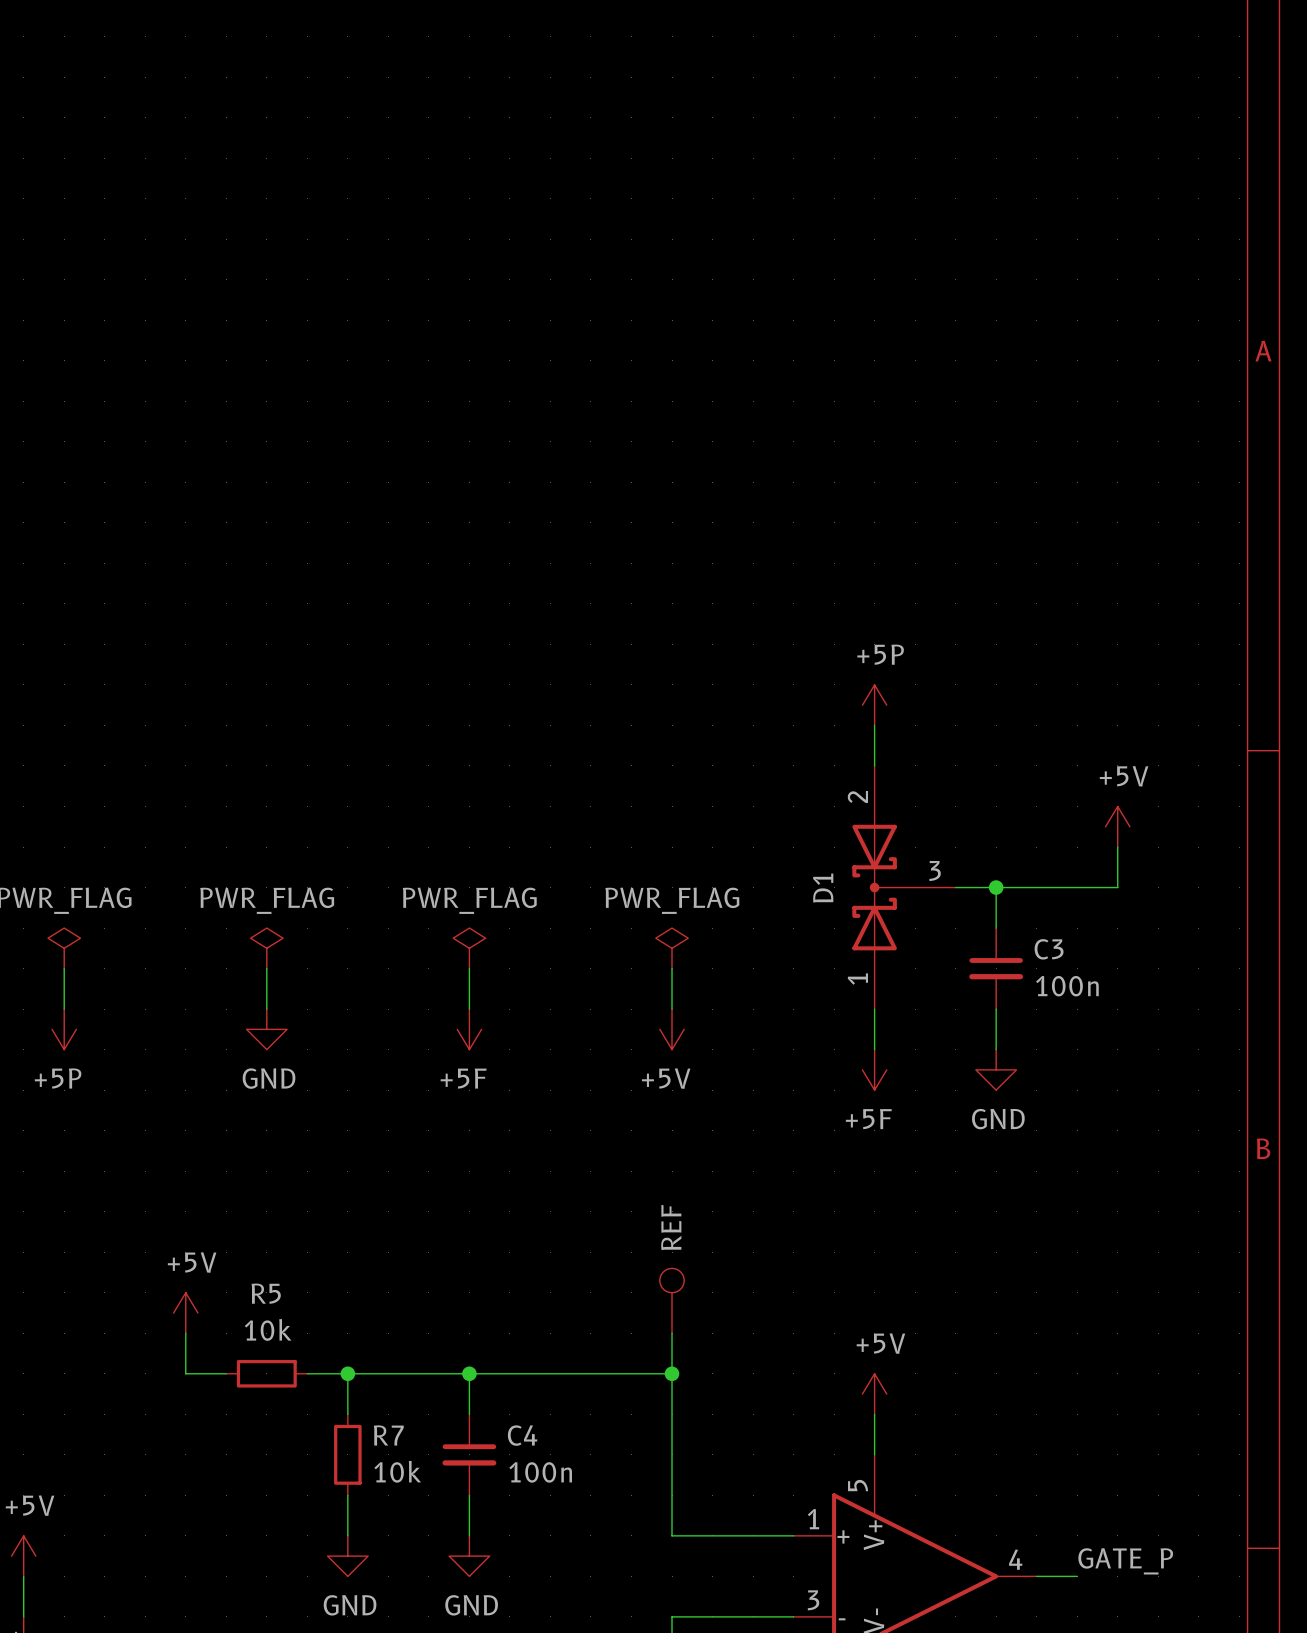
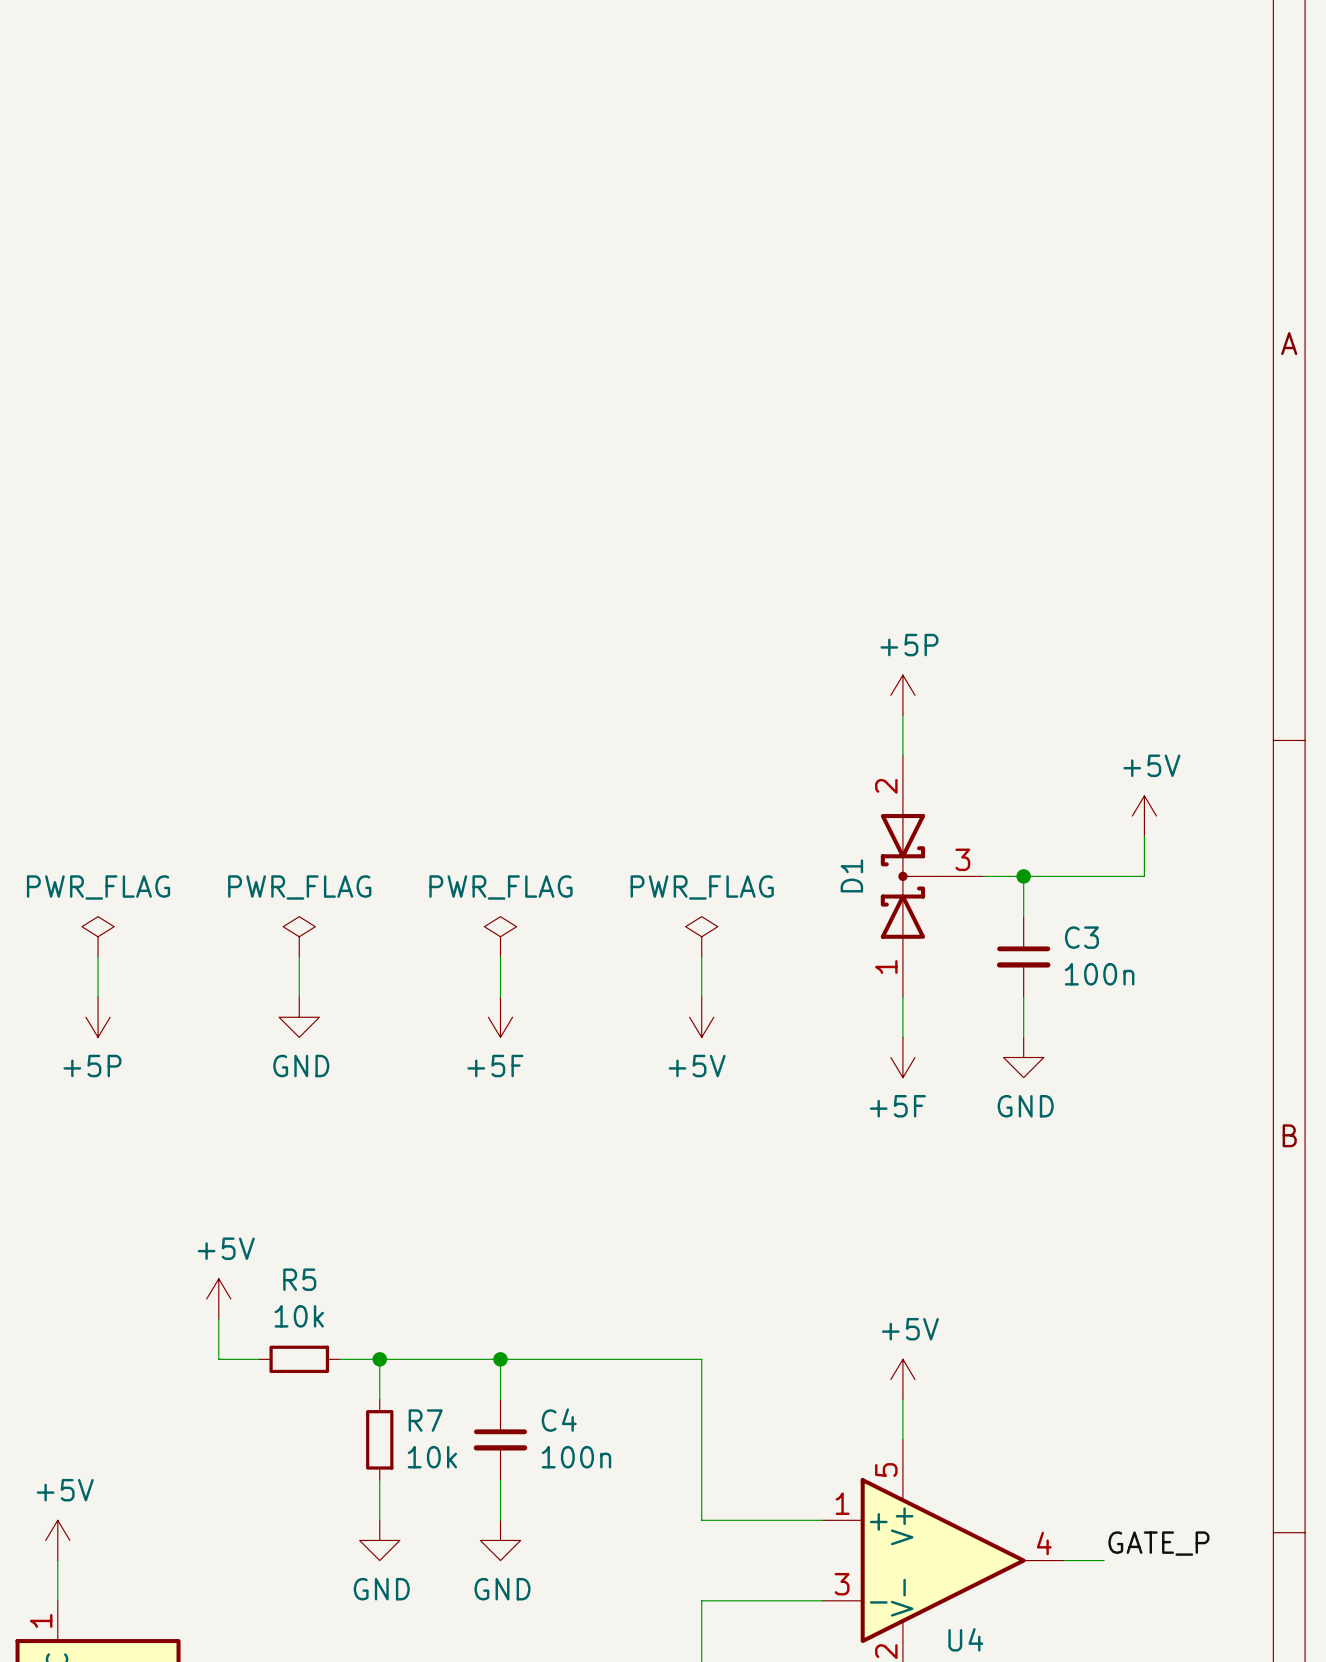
part: REF (672, 1300) -> none
wire: (672, 1333) (672, 1373) -> none
junction: (672, 1373) -> none

